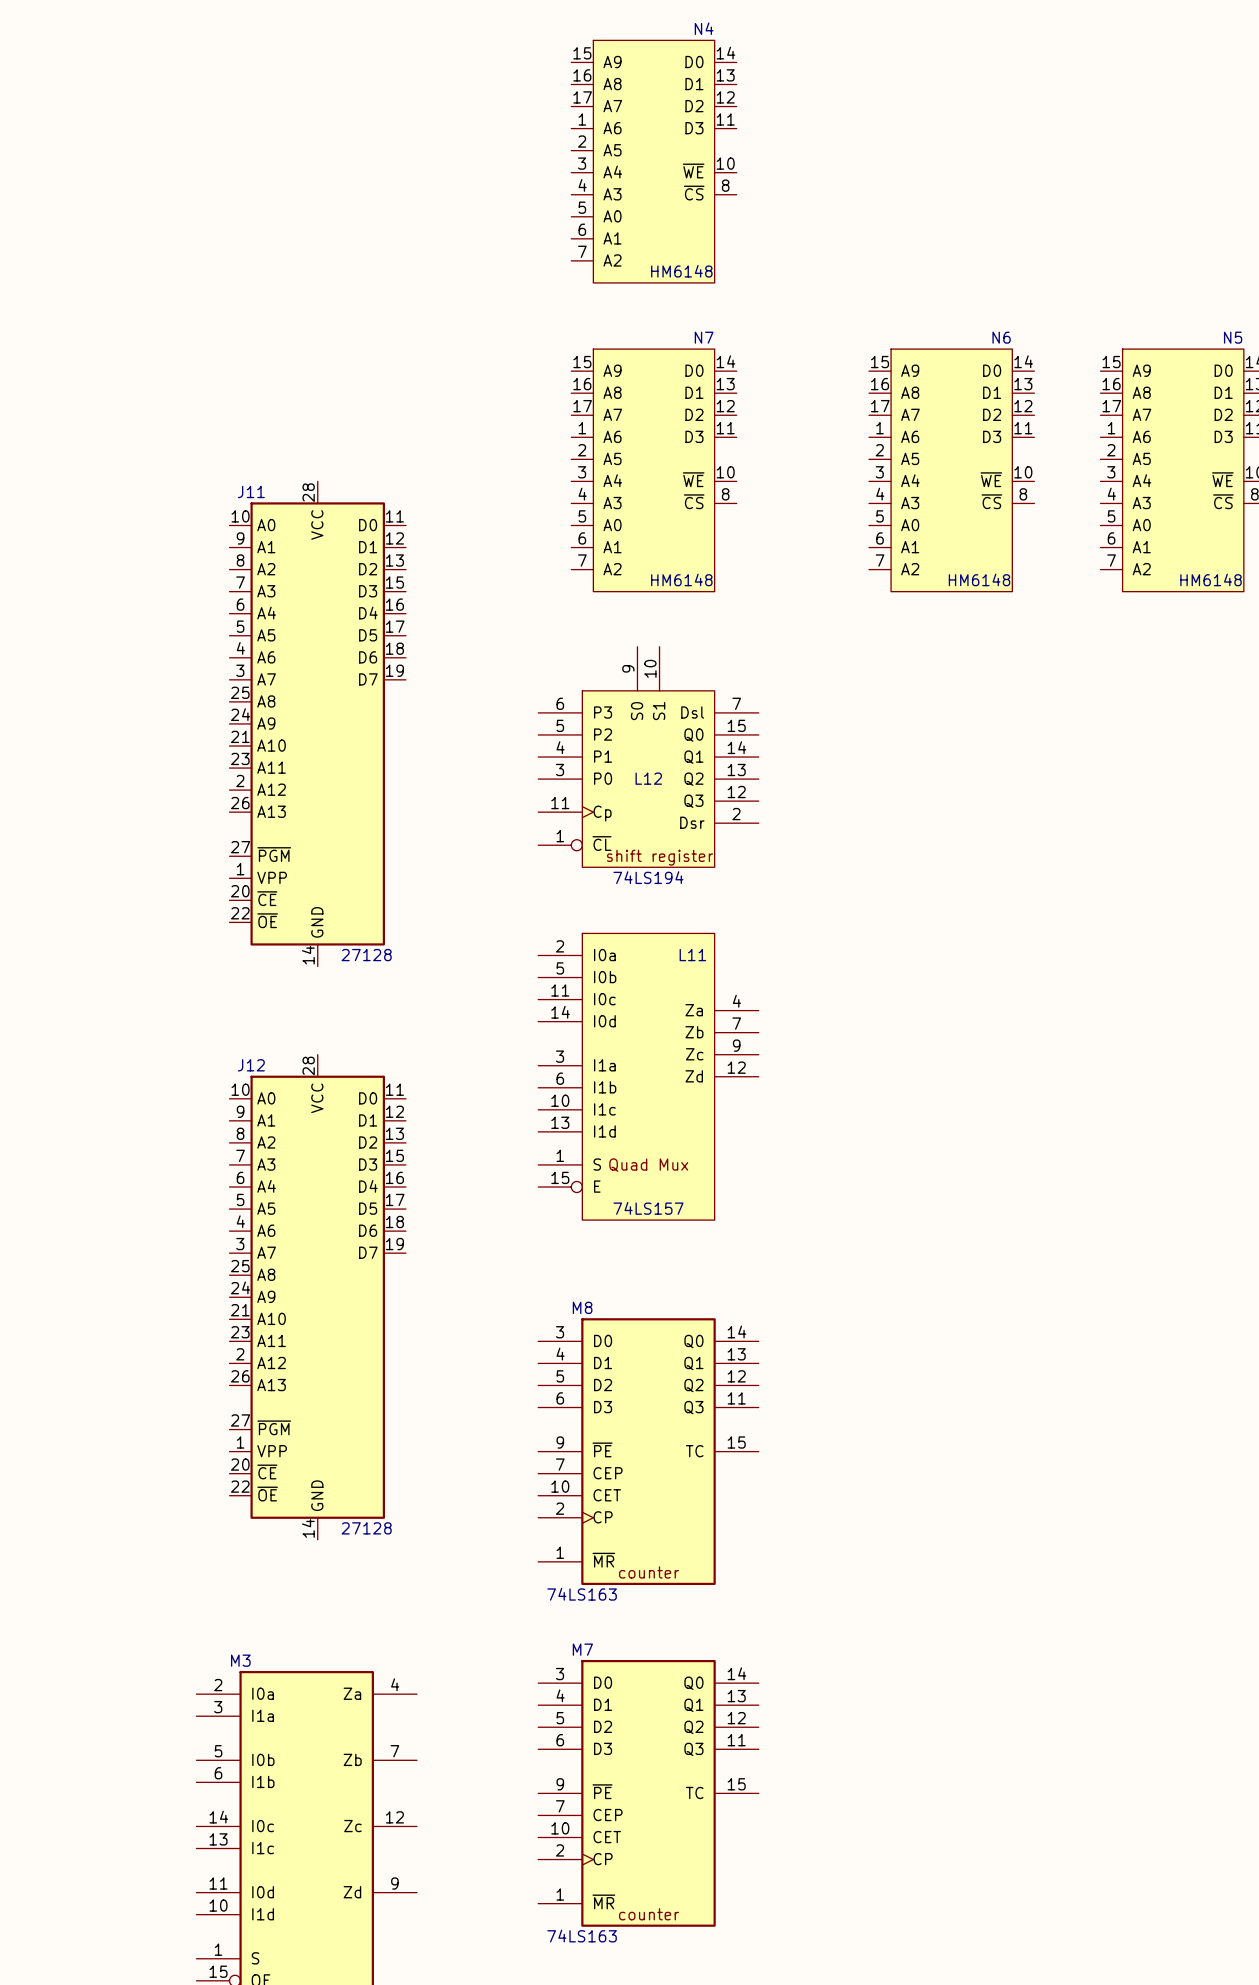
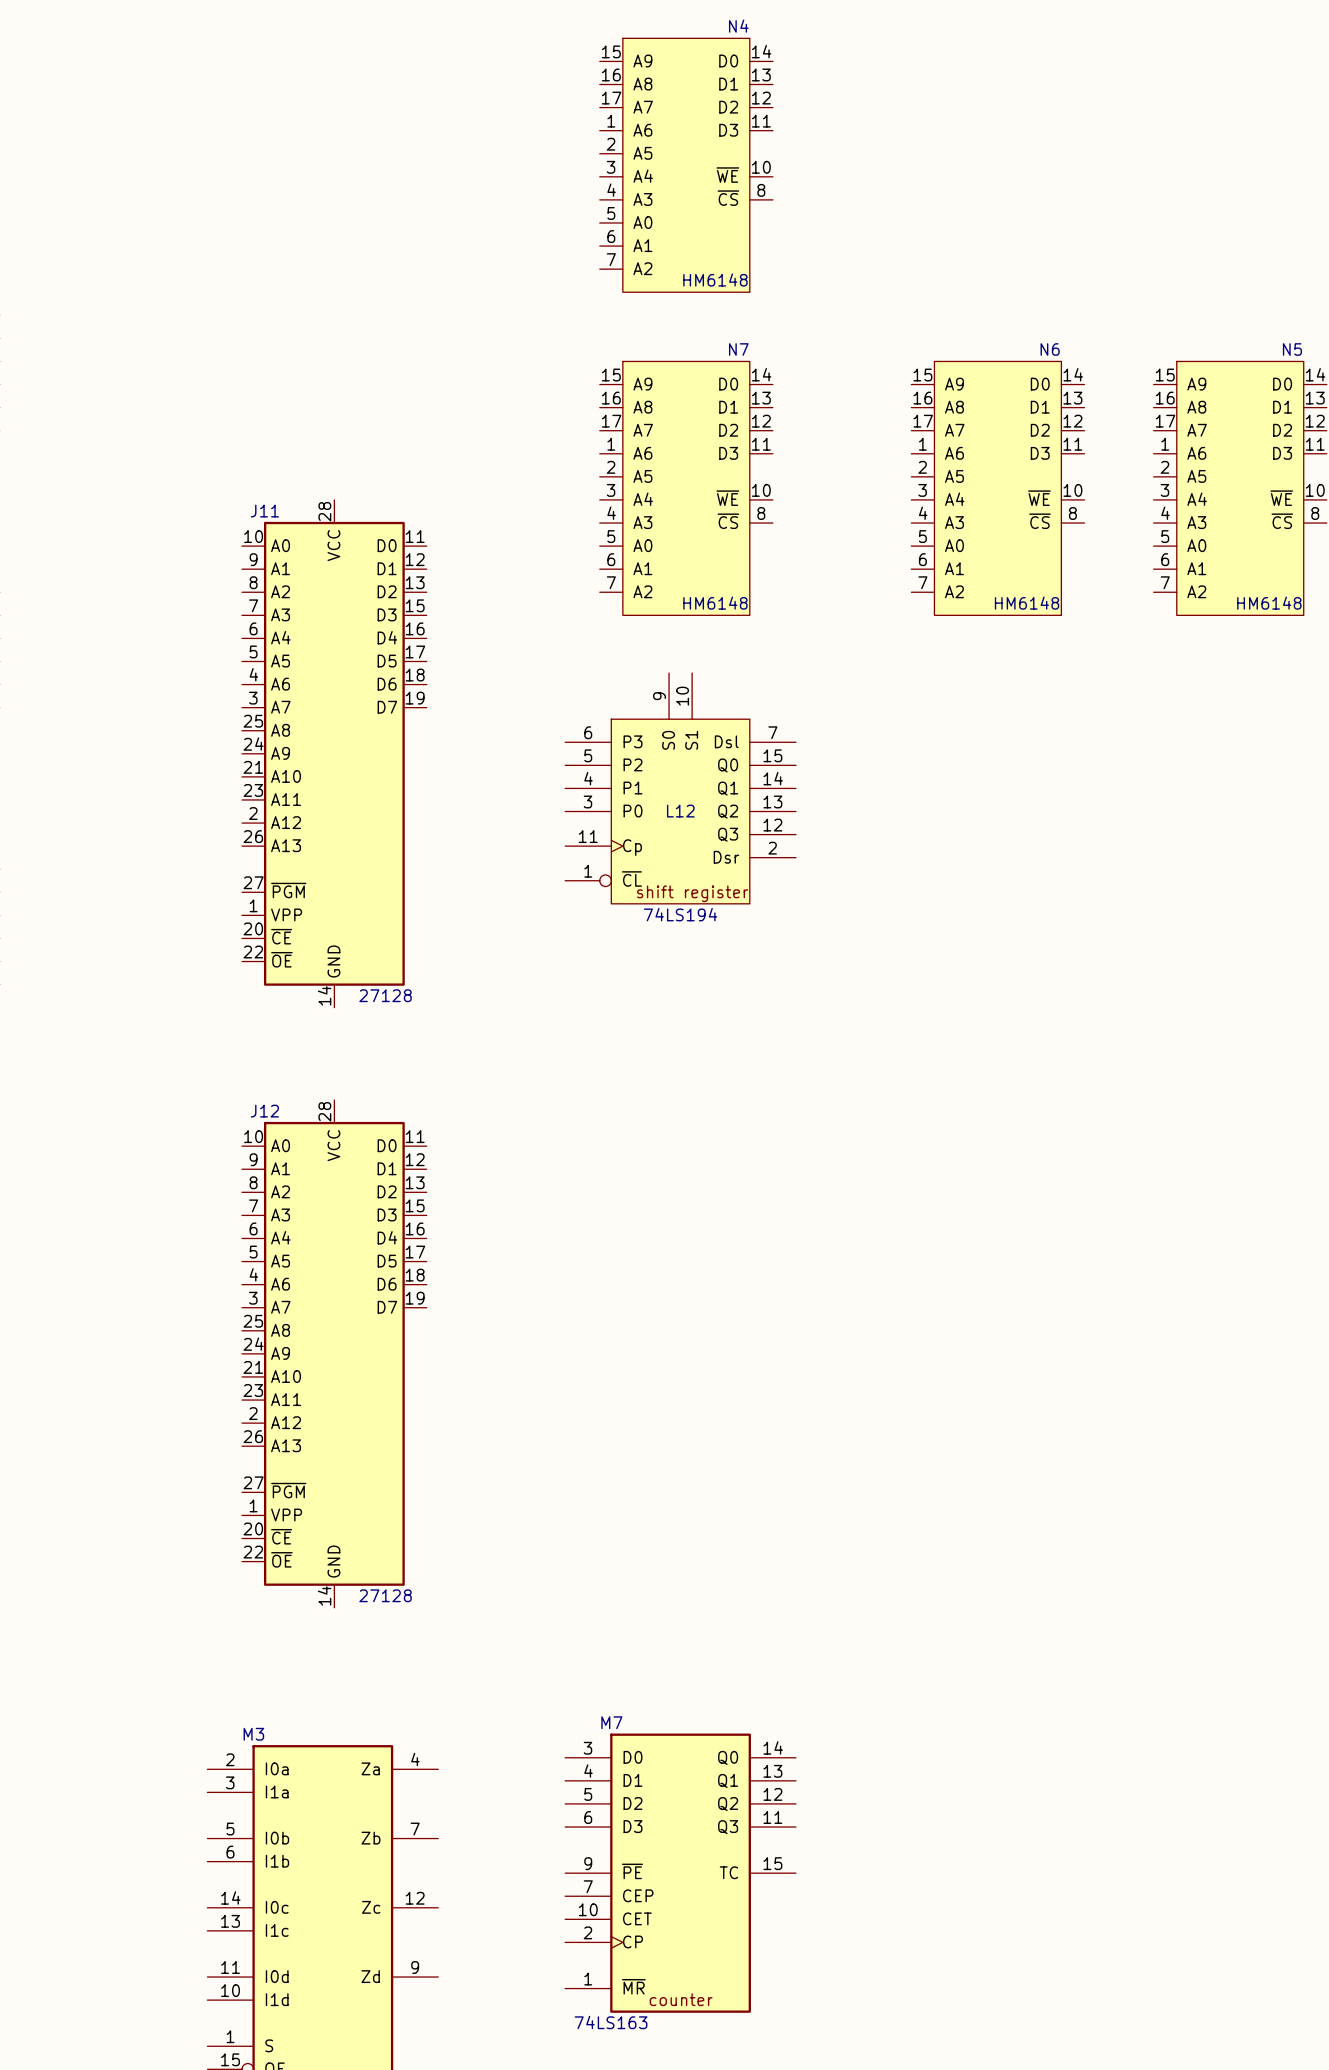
L11: 74LS157 (648, 1076) -> none
M8: 74LS163 (648, 1451) -> none

